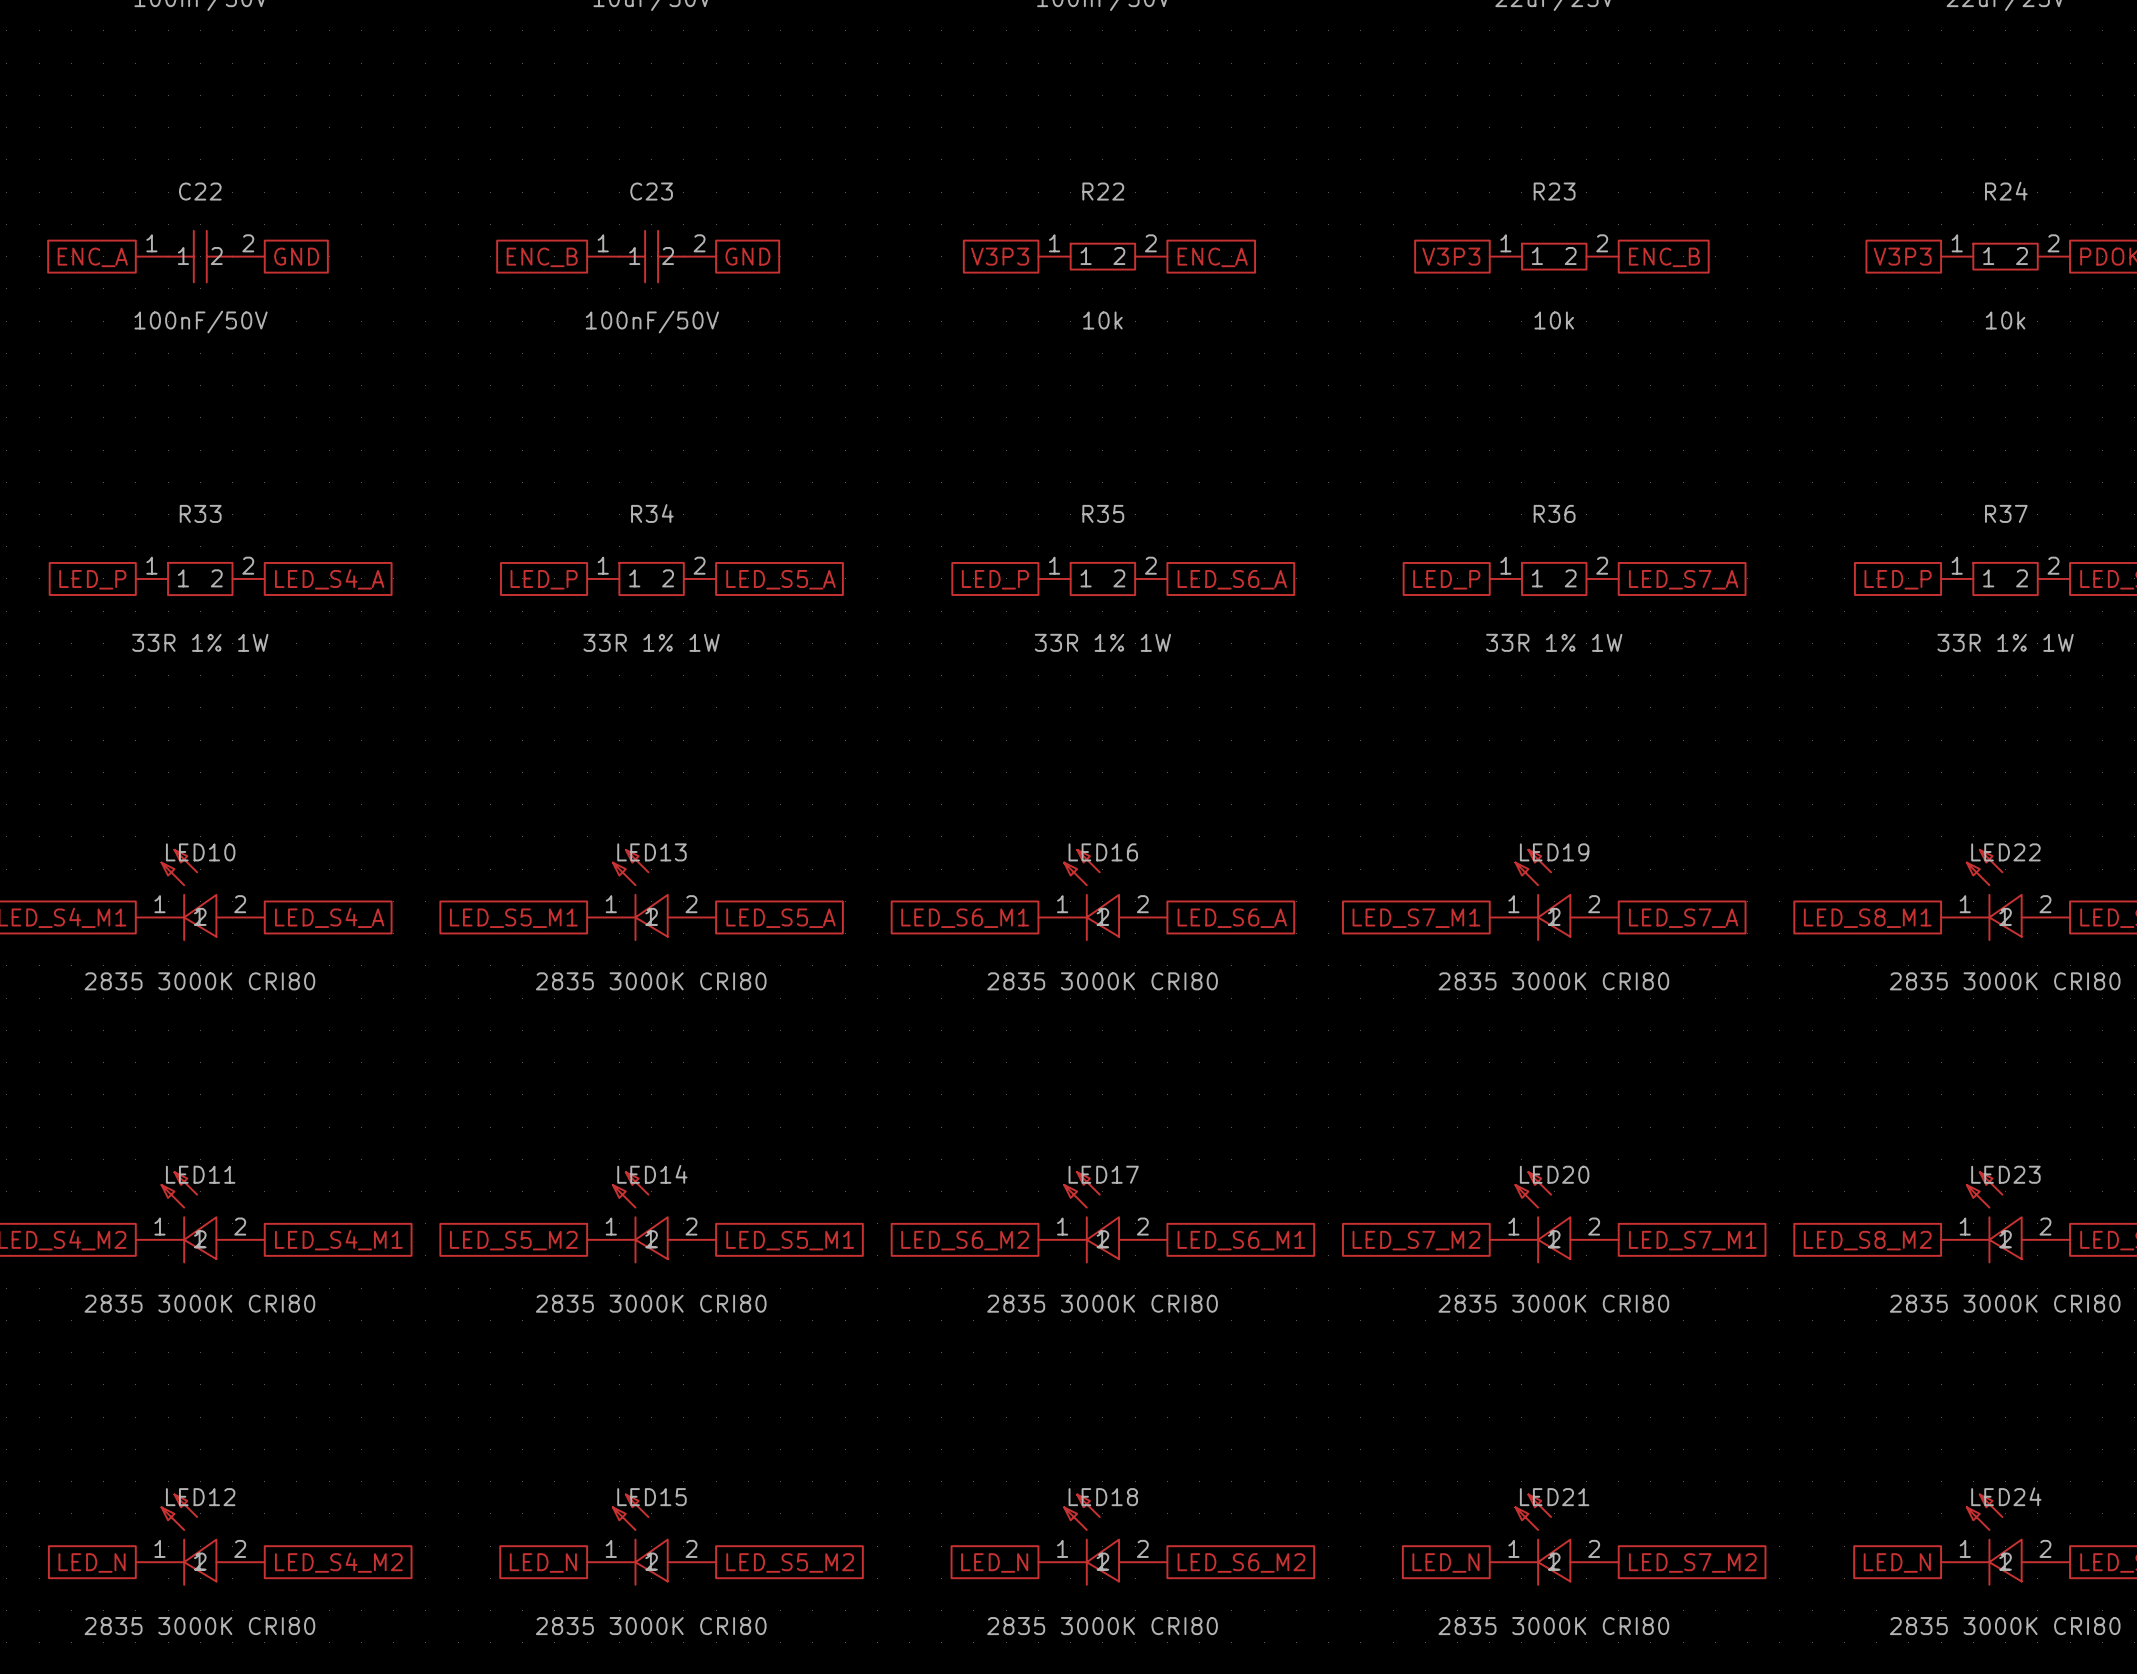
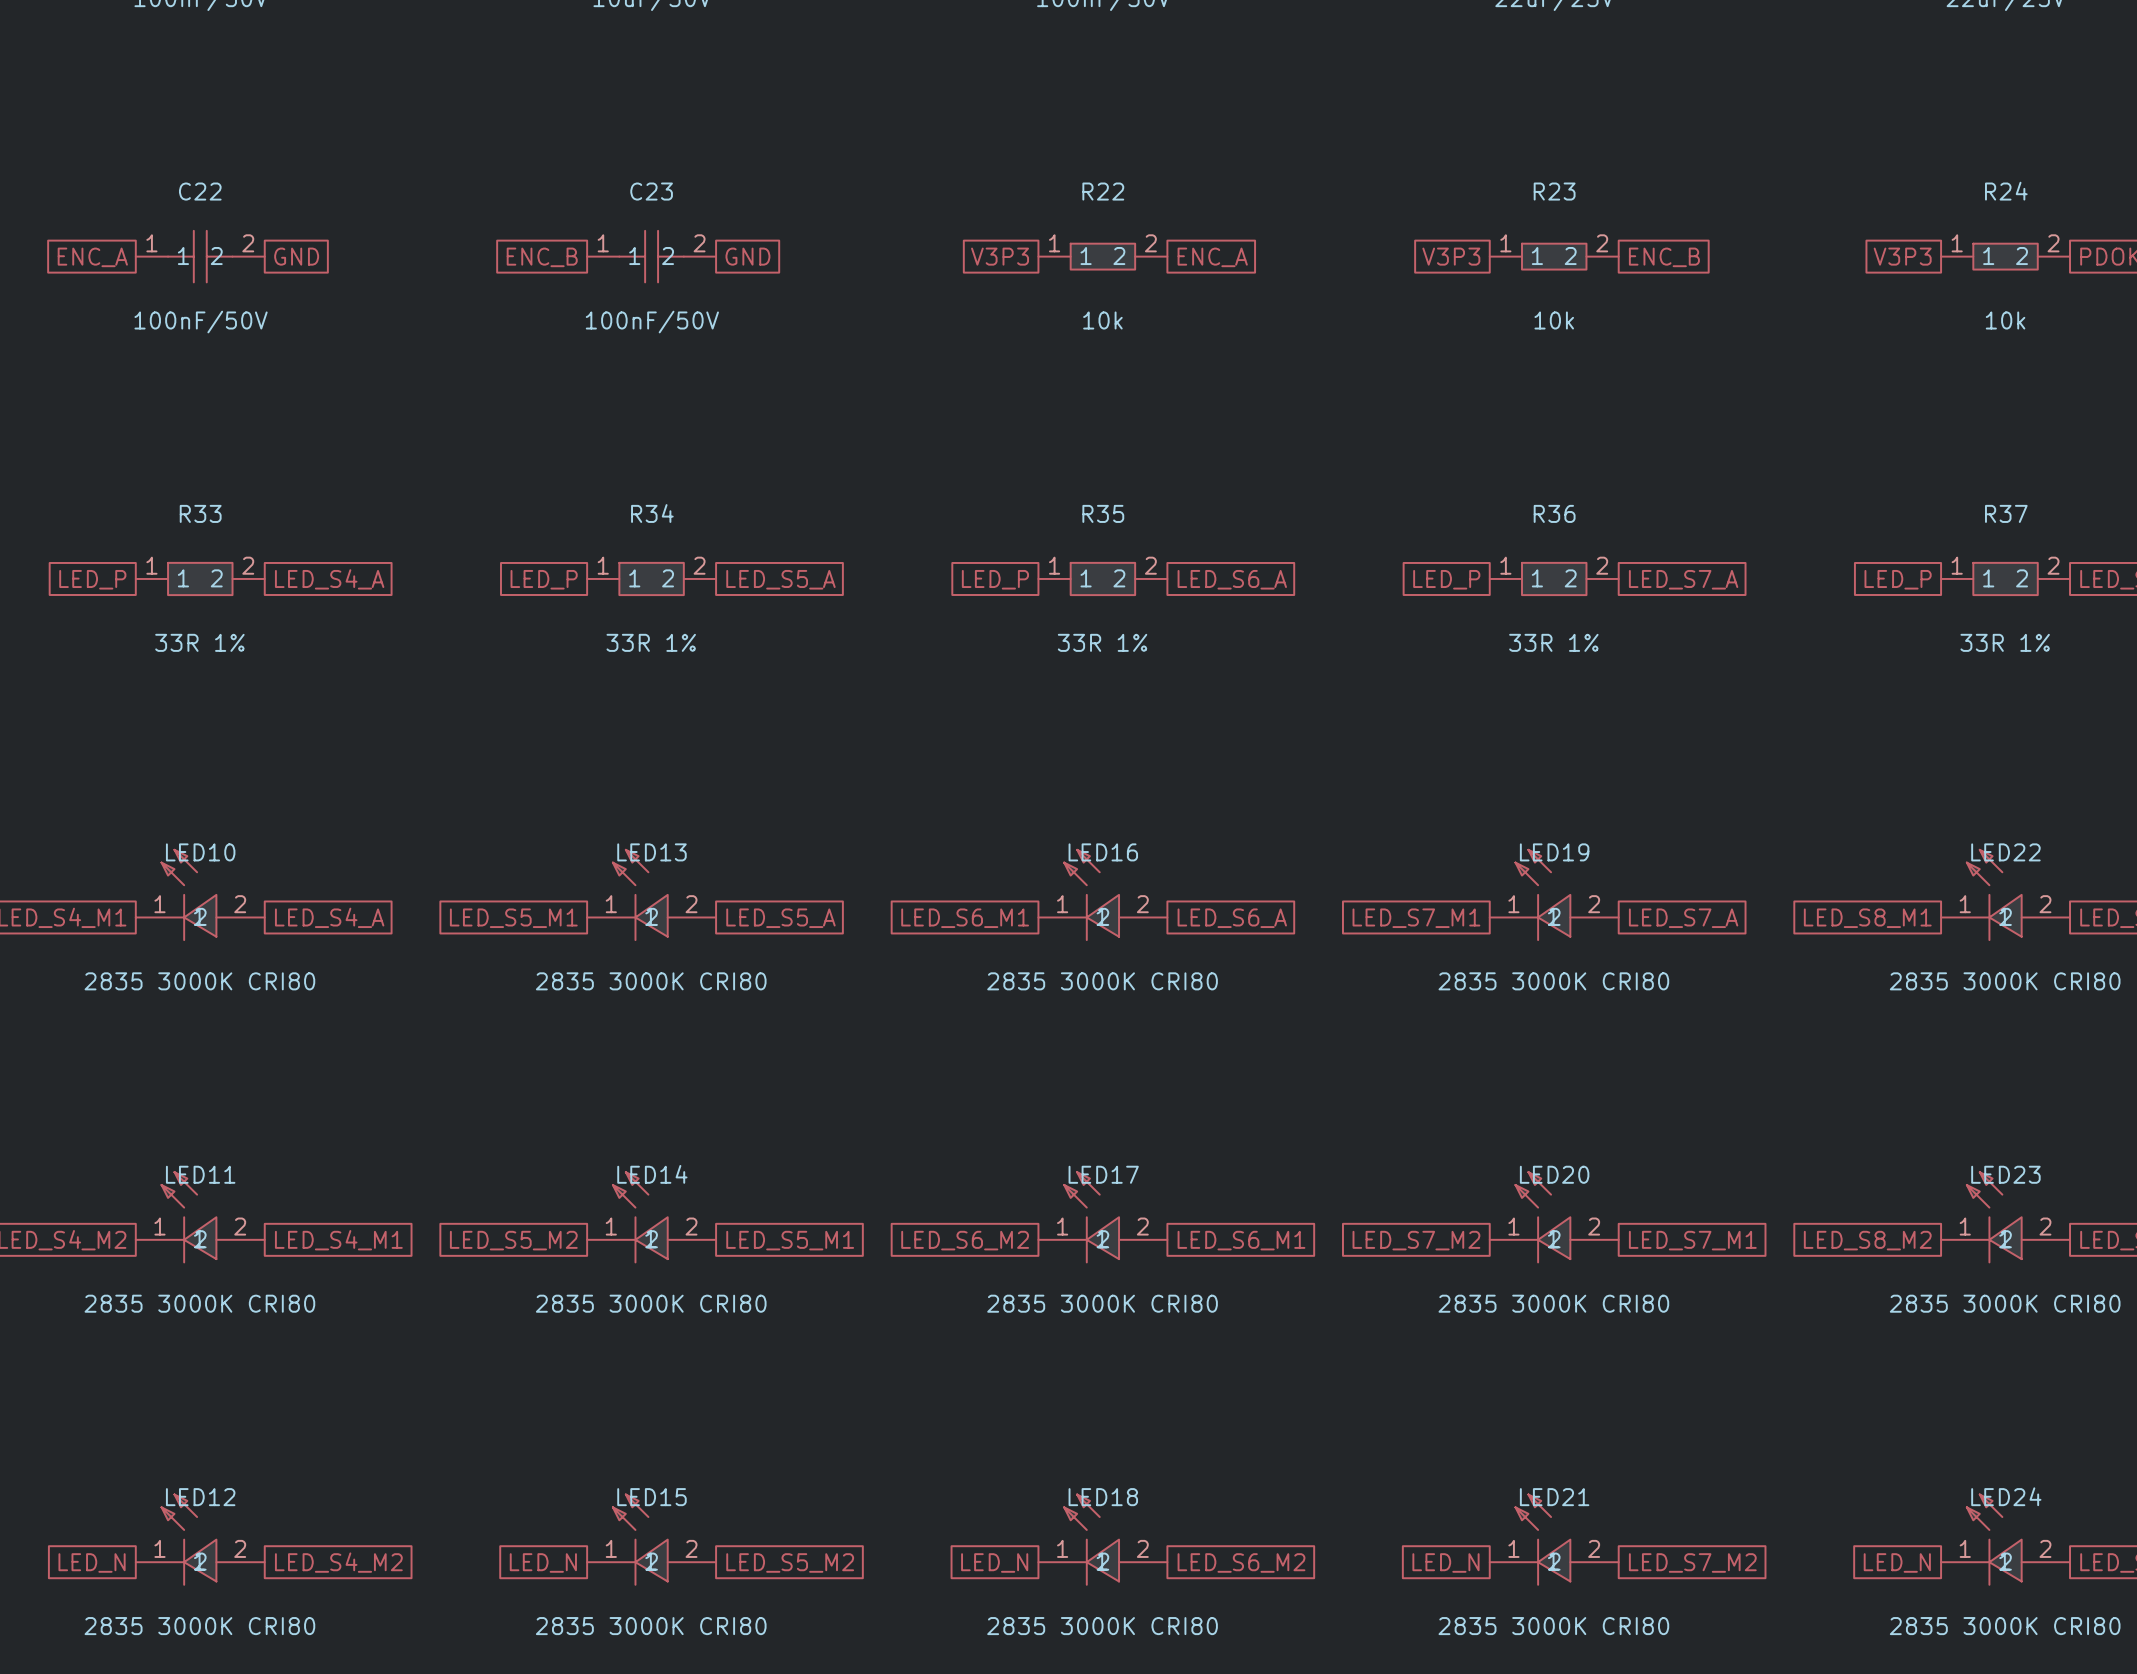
R33 value: 33R 1% 1W (200, 642) -> 33R 1% (199, 642)
R34 value: 33R 1% 1W (651, 642) -> 33R 1% (651, 642)
R35 value: 33R 1% 1W (1102, 642) -> 33R 1% (1102, 642)
R36 value: 33R 1% 1W (1554, 642) -> 33R 1% (1553, 642)
R37 value: 33R 1% 1W (2005, 642) -> 33R 1% (2005, 642)

